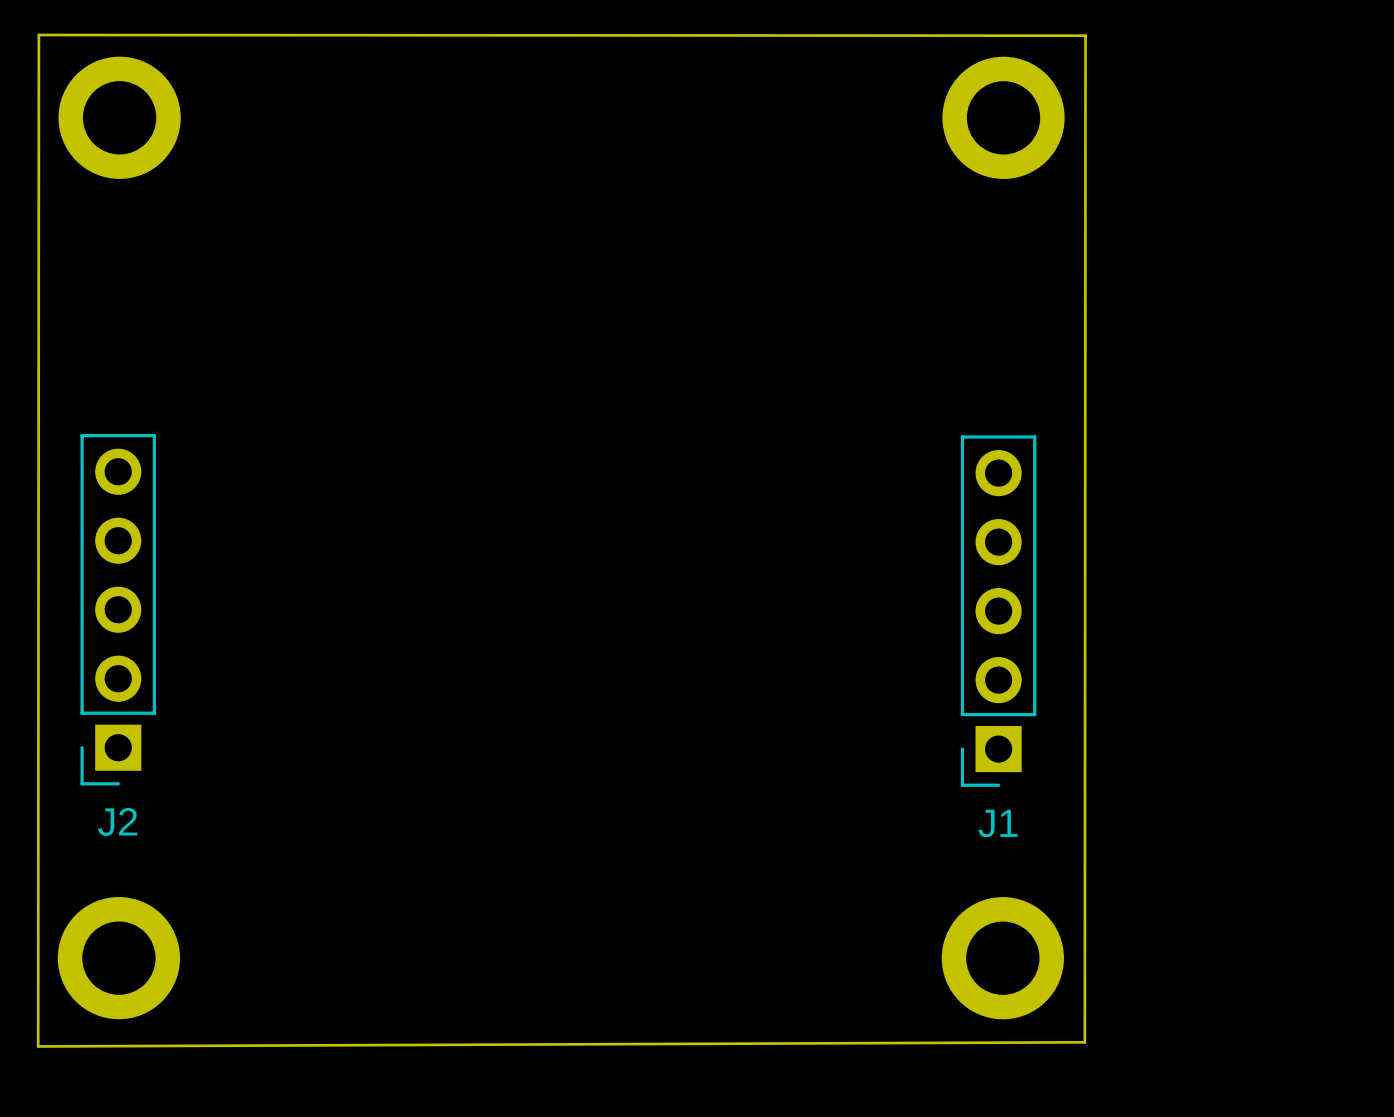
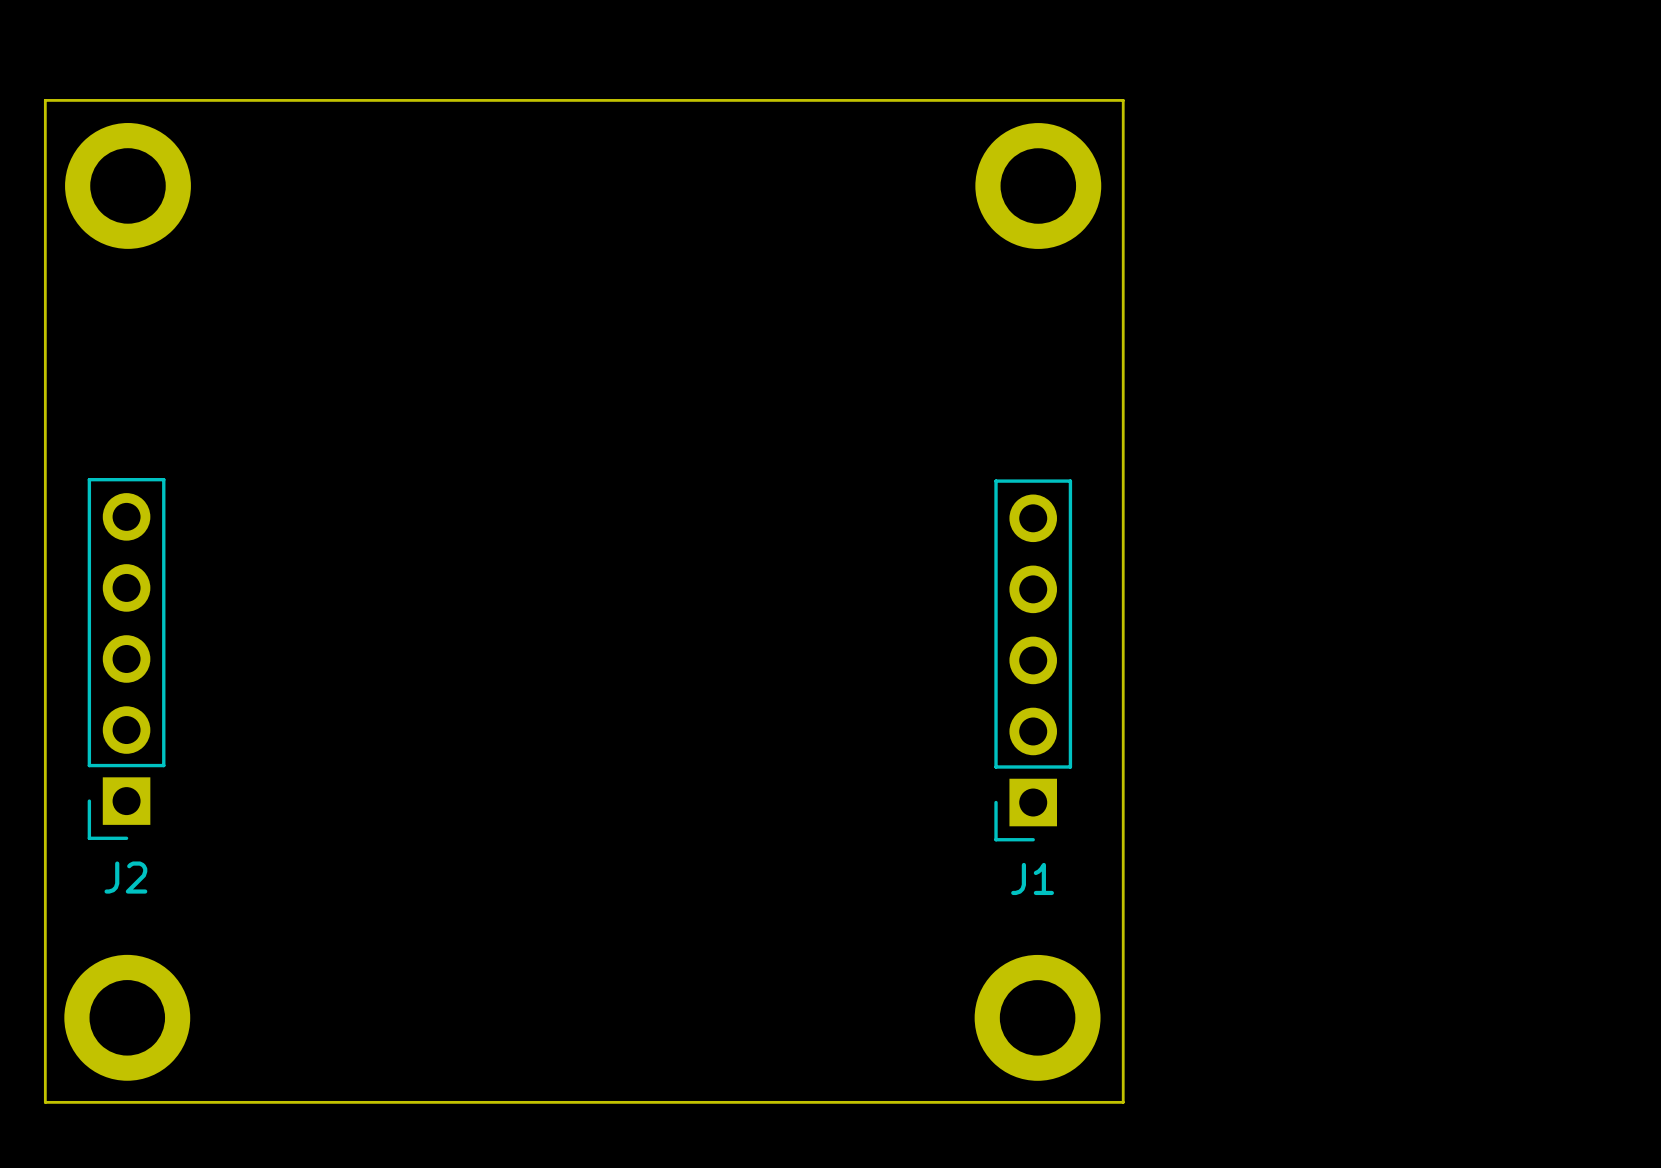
board edge: (38, 35) (1085, 35) (1084, 1042) (38, 1046) (38, 35) -> (1123, 100) (1123, 1102) (45, 1102) (45, 100) (1123, 100)
part position: (119, 117) -> (127, 185)
part position: (1003, 117) -> (1038, 186)

